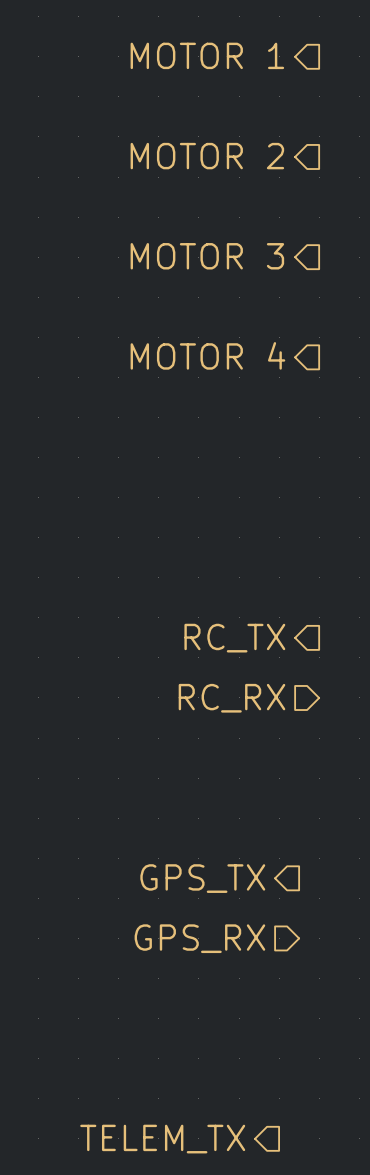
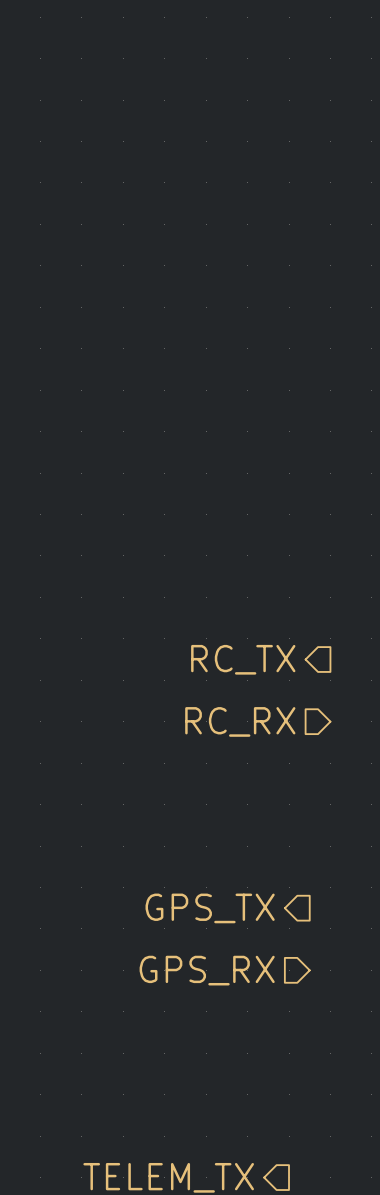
hierarchical label: MOTOR 1 (207, 55) -> none
hierarchical label: MOTOR 2 (207, 156) -> none
hierarchical label: MOTOR 3 (207, 256) -> none
hierarchical label: MOTOR 4 (207, 355) -> none

